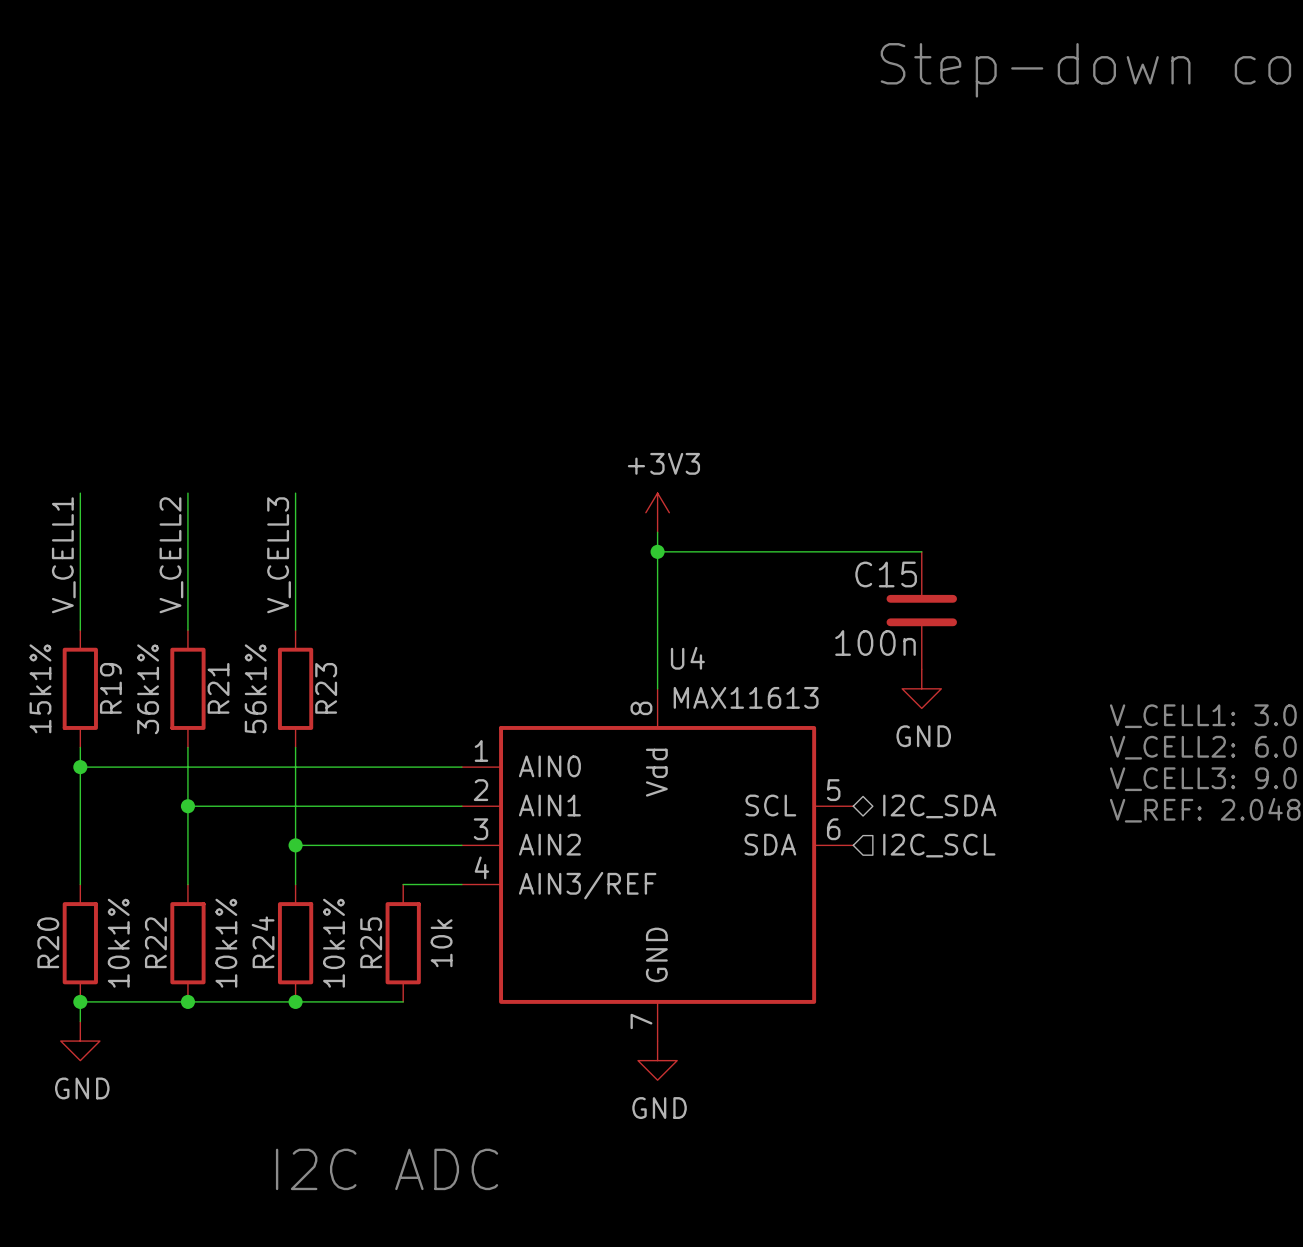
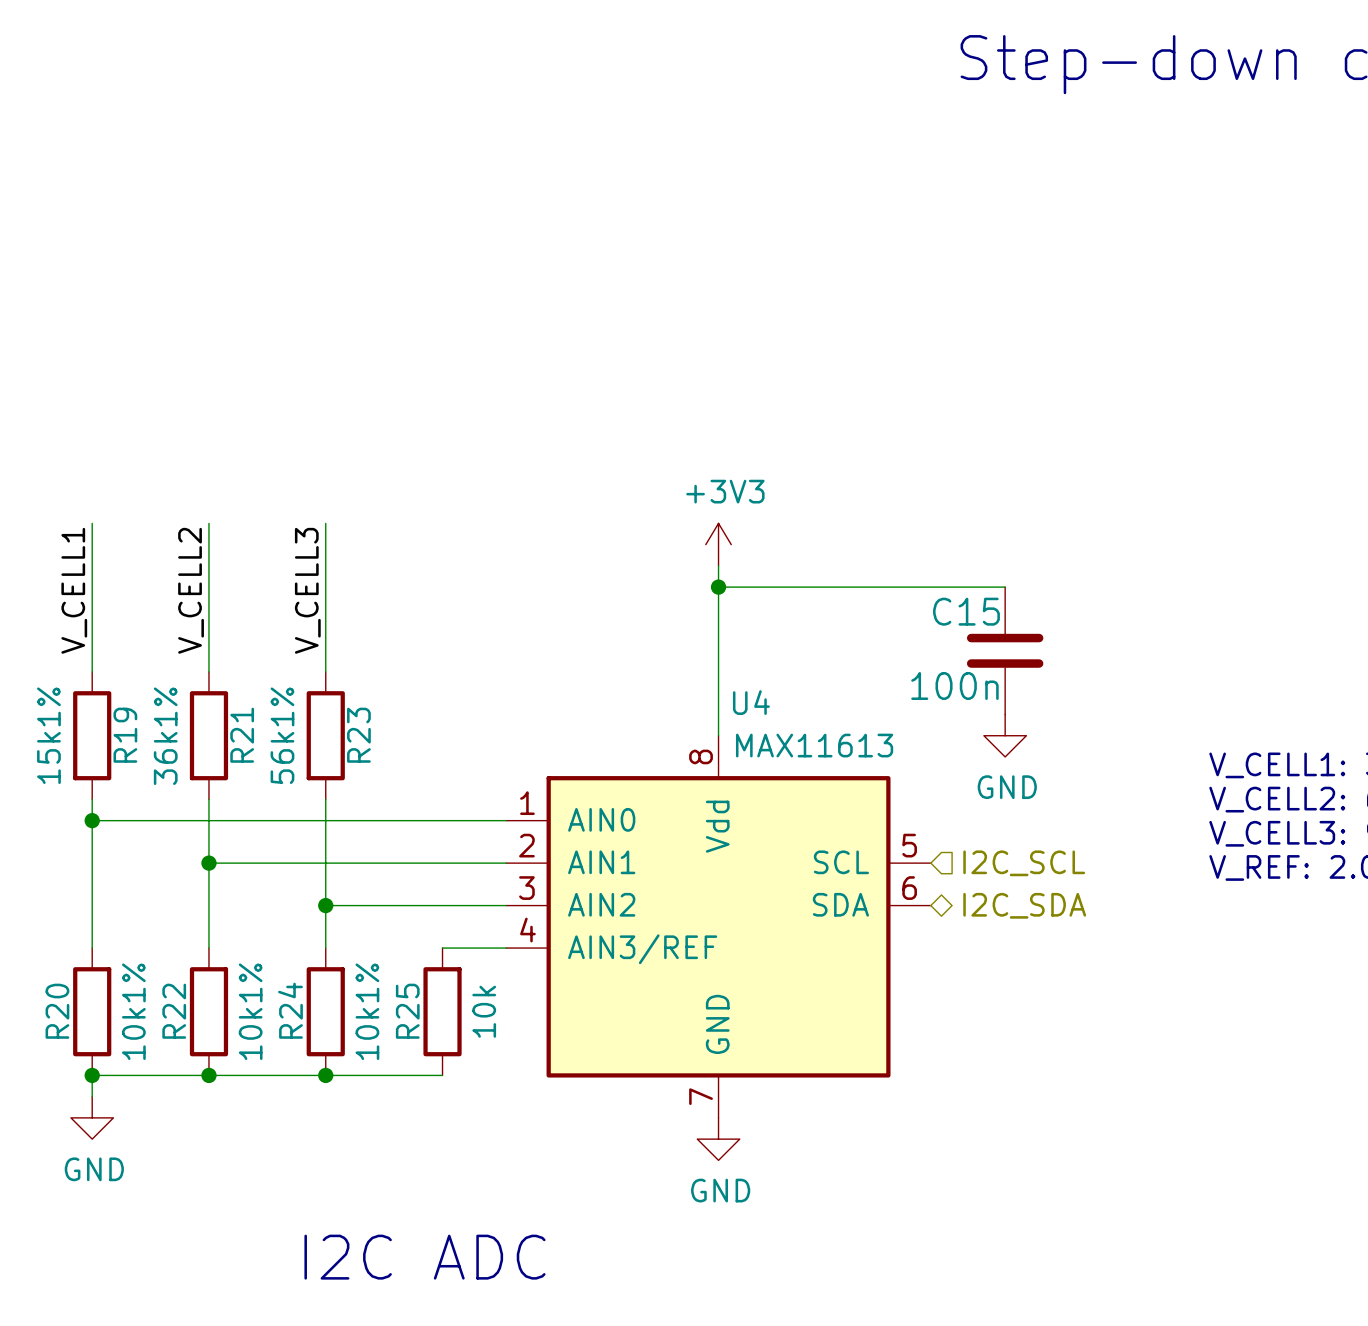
hierarchical label shape: bidirectional (939, 806) -> input (1024, 863)
hierarchical label: I2C_SDA (939, 806) -> I2C_SCL (1024, 863)
hierarchical label shape: input (939, 845) -> bidirectional (1024, 905)
hierarchical label: I2C_SCL (939, 845) -> I2C_SDA (1024, 905)

